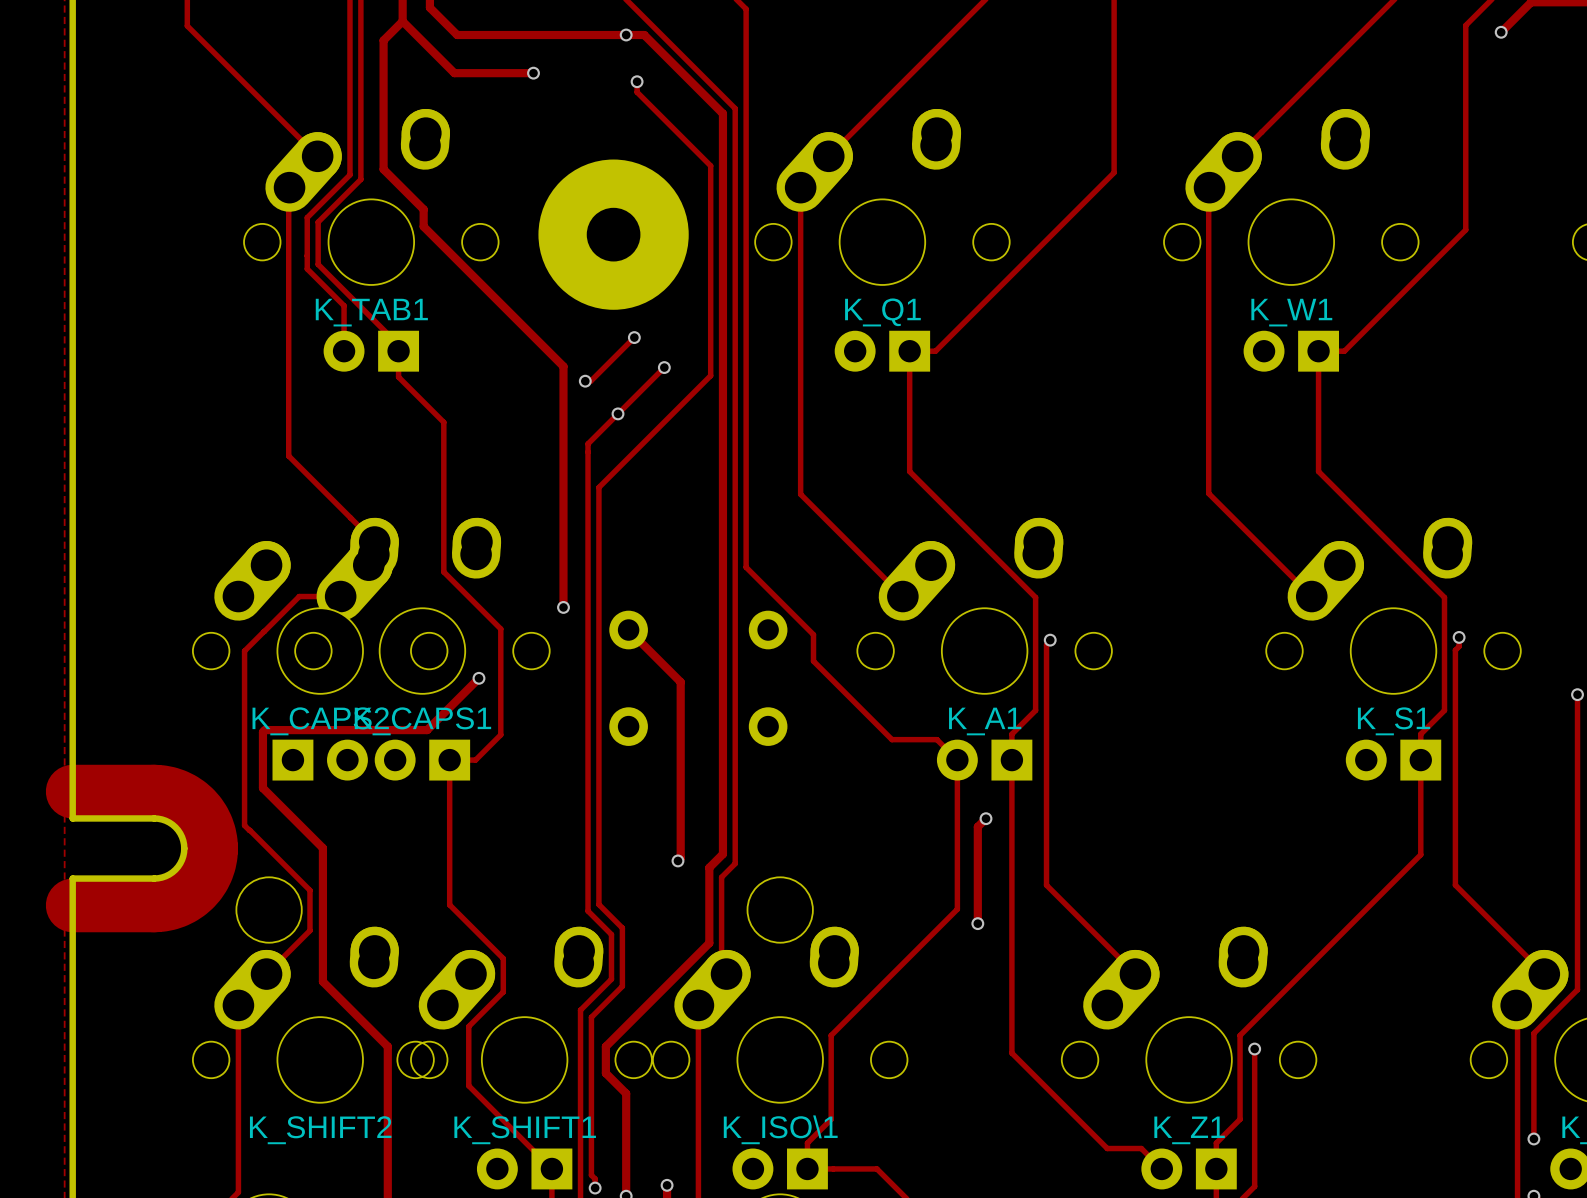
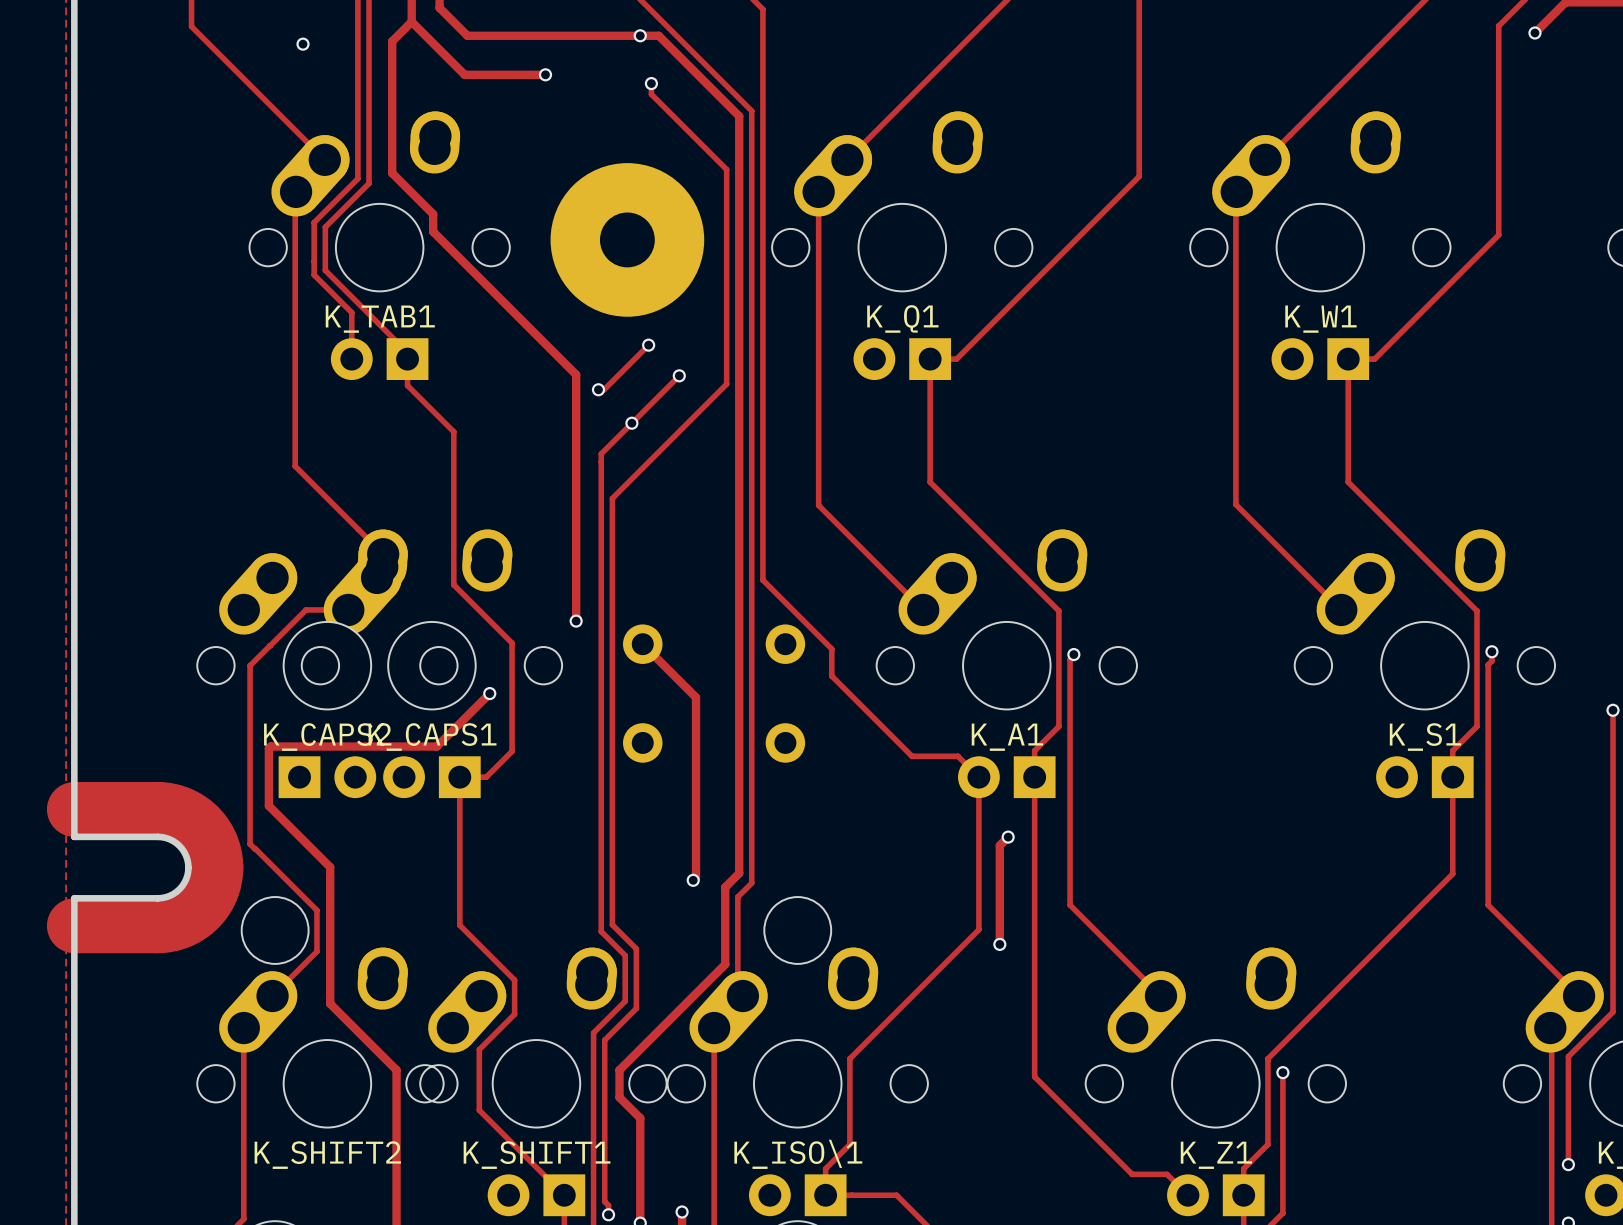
via: none -> (303, 44)

